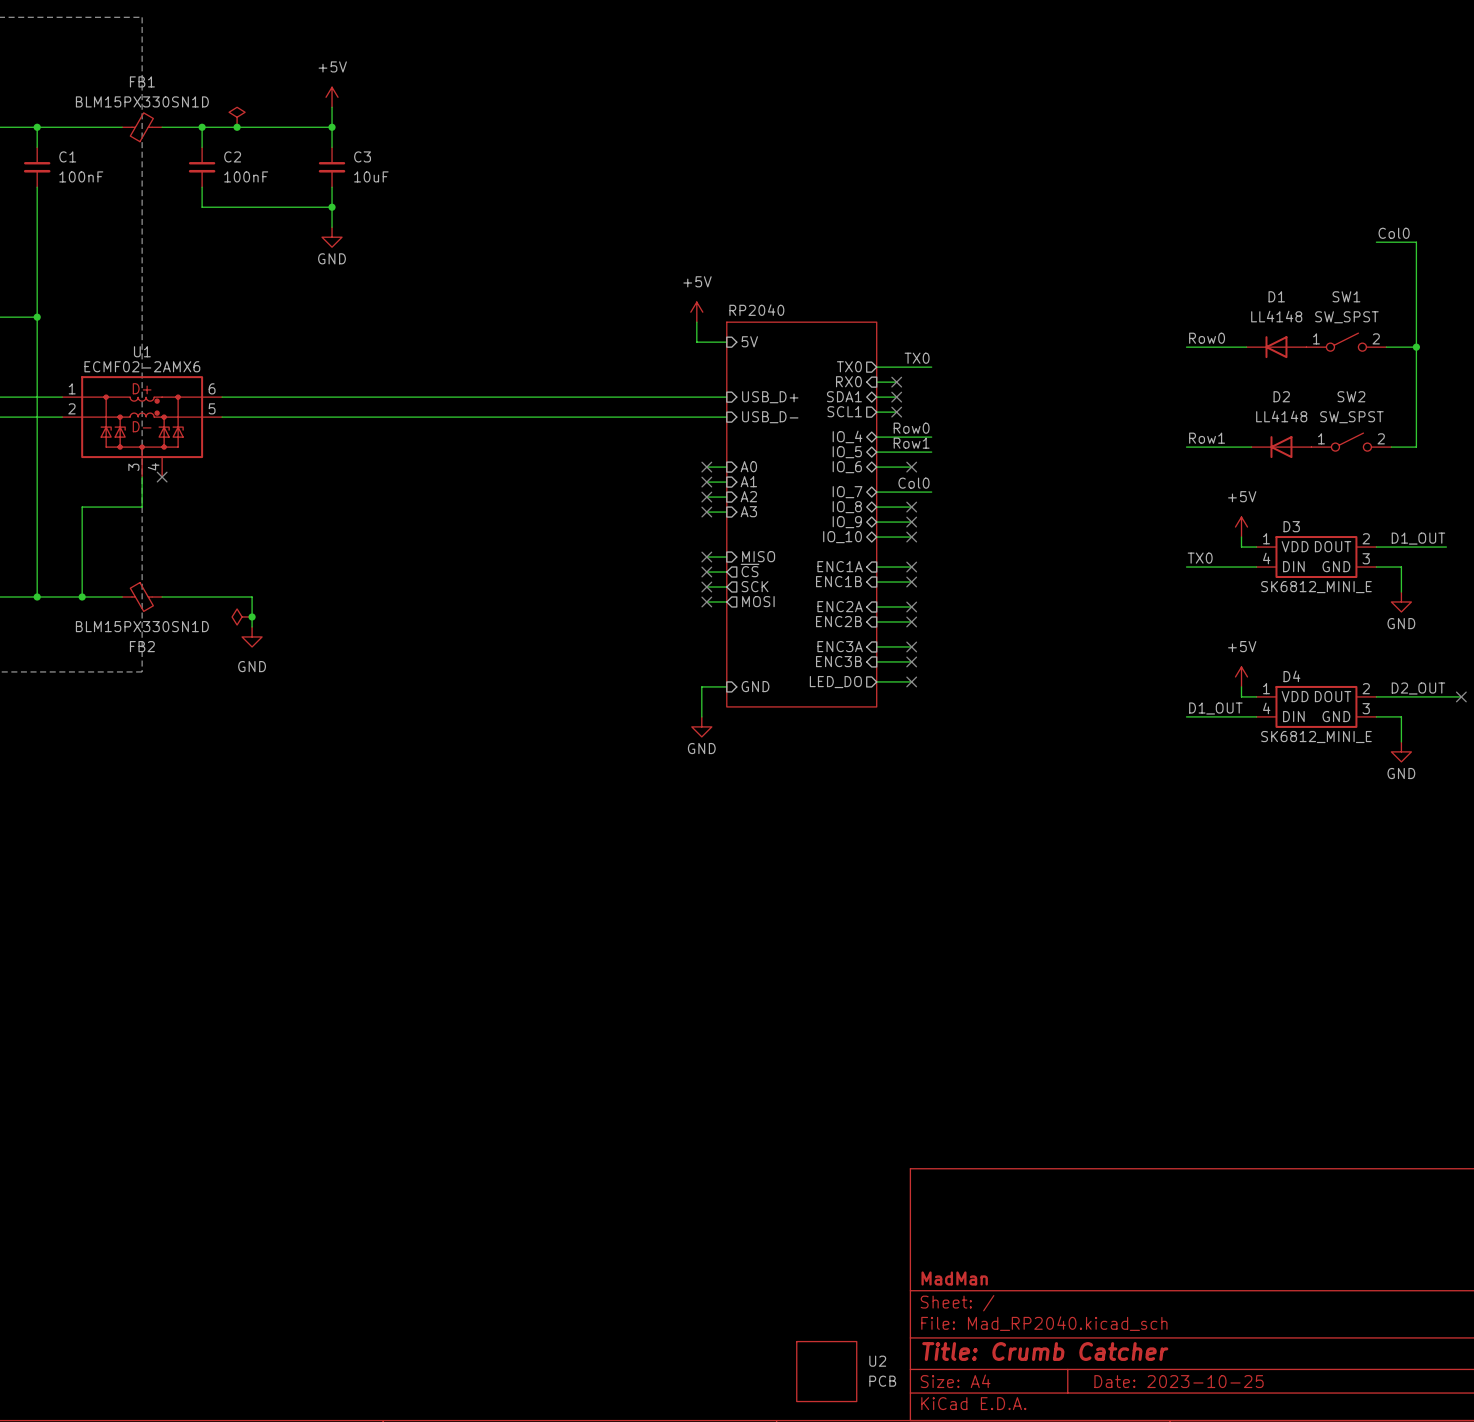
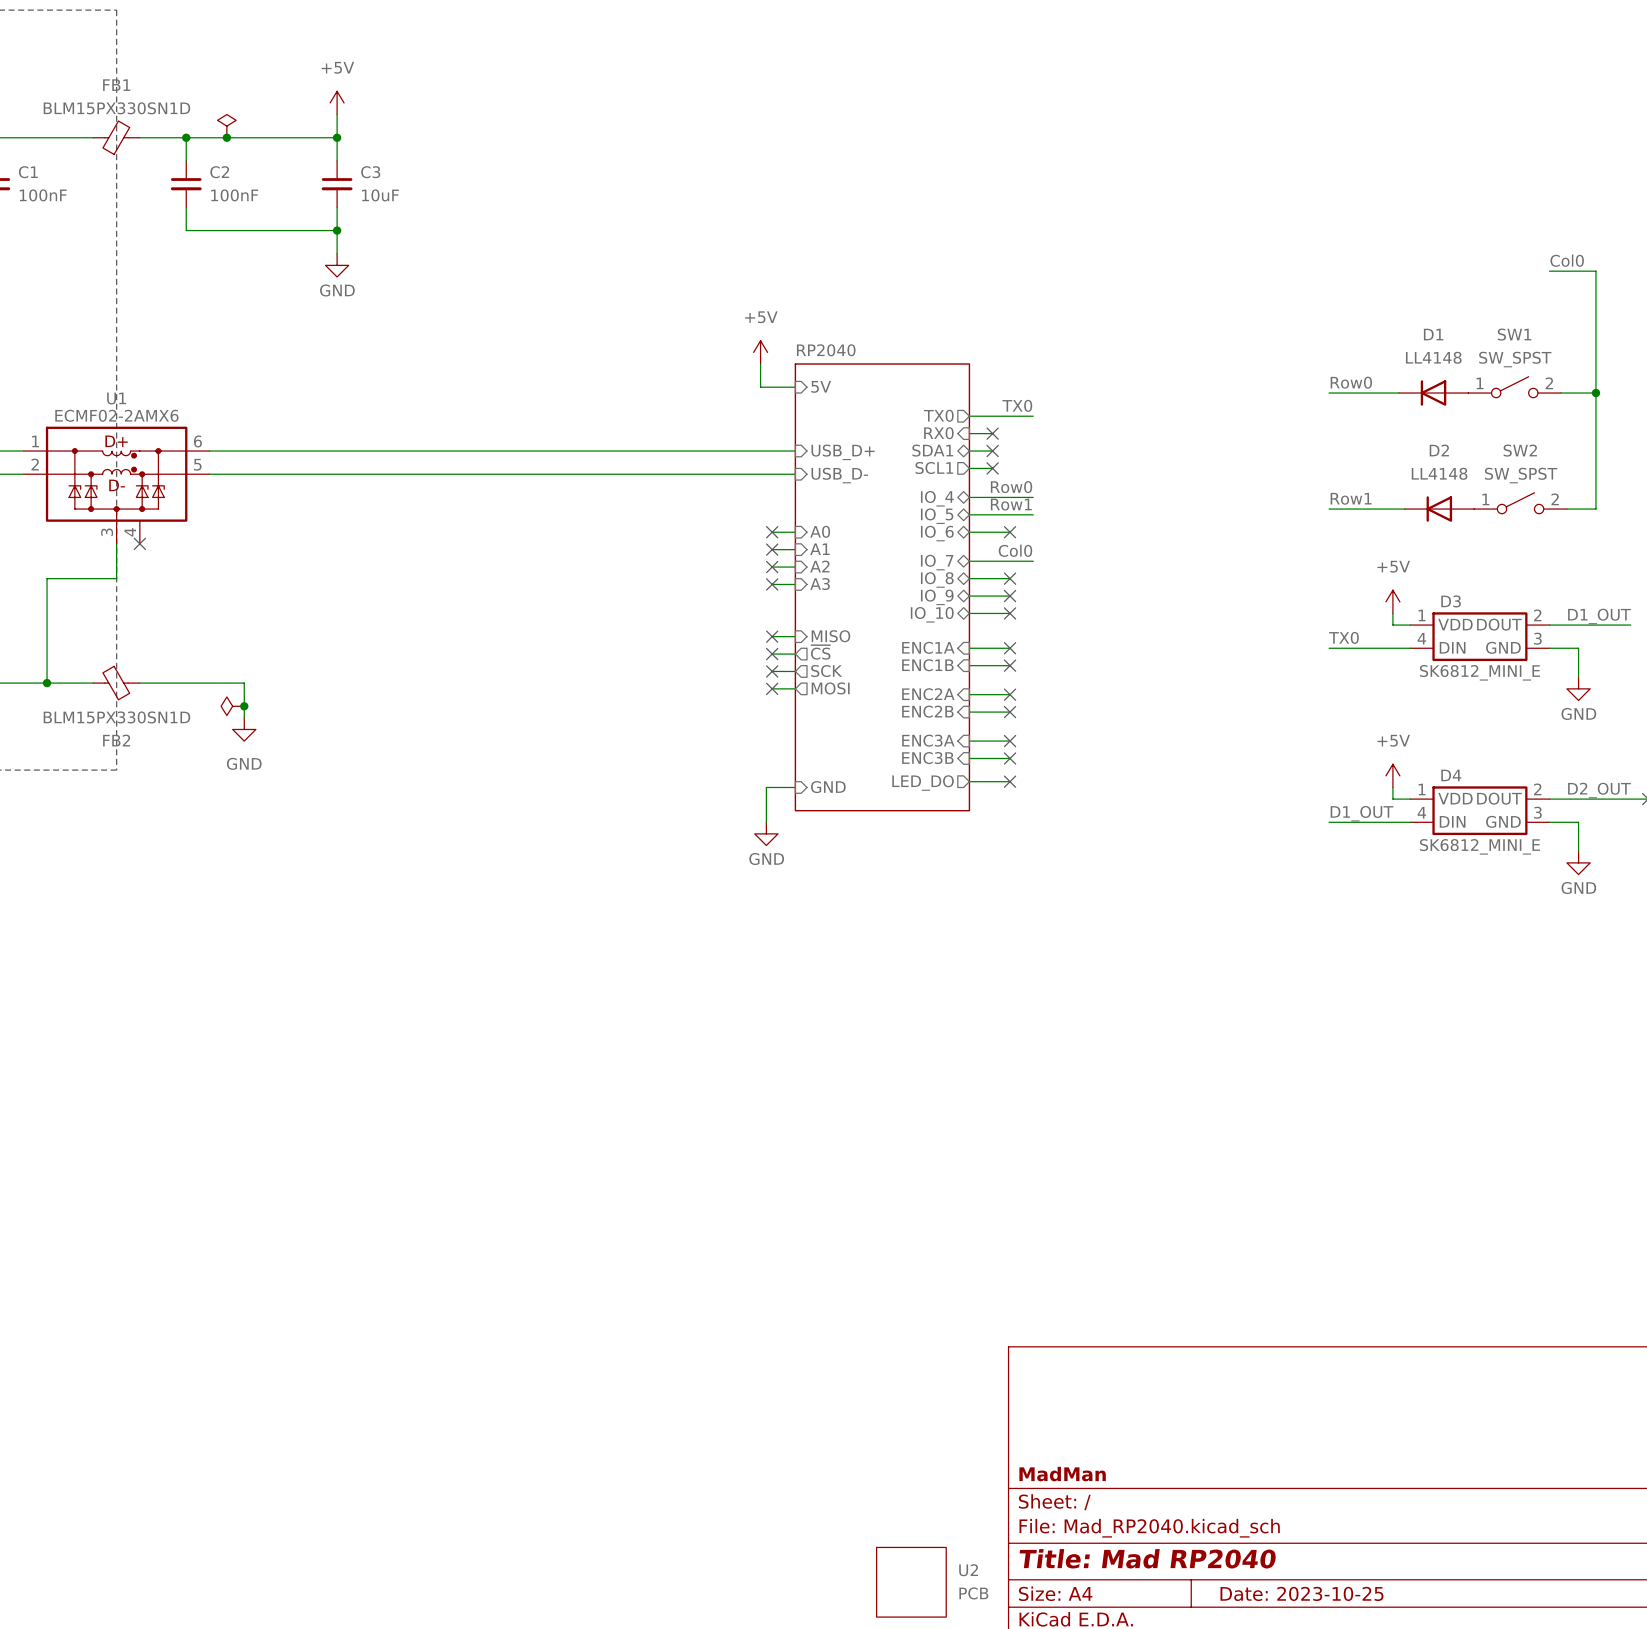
title block: Title: Crumb Catcher (1045, 1351) -> Title: Mad RP2040 (1147, 1558)

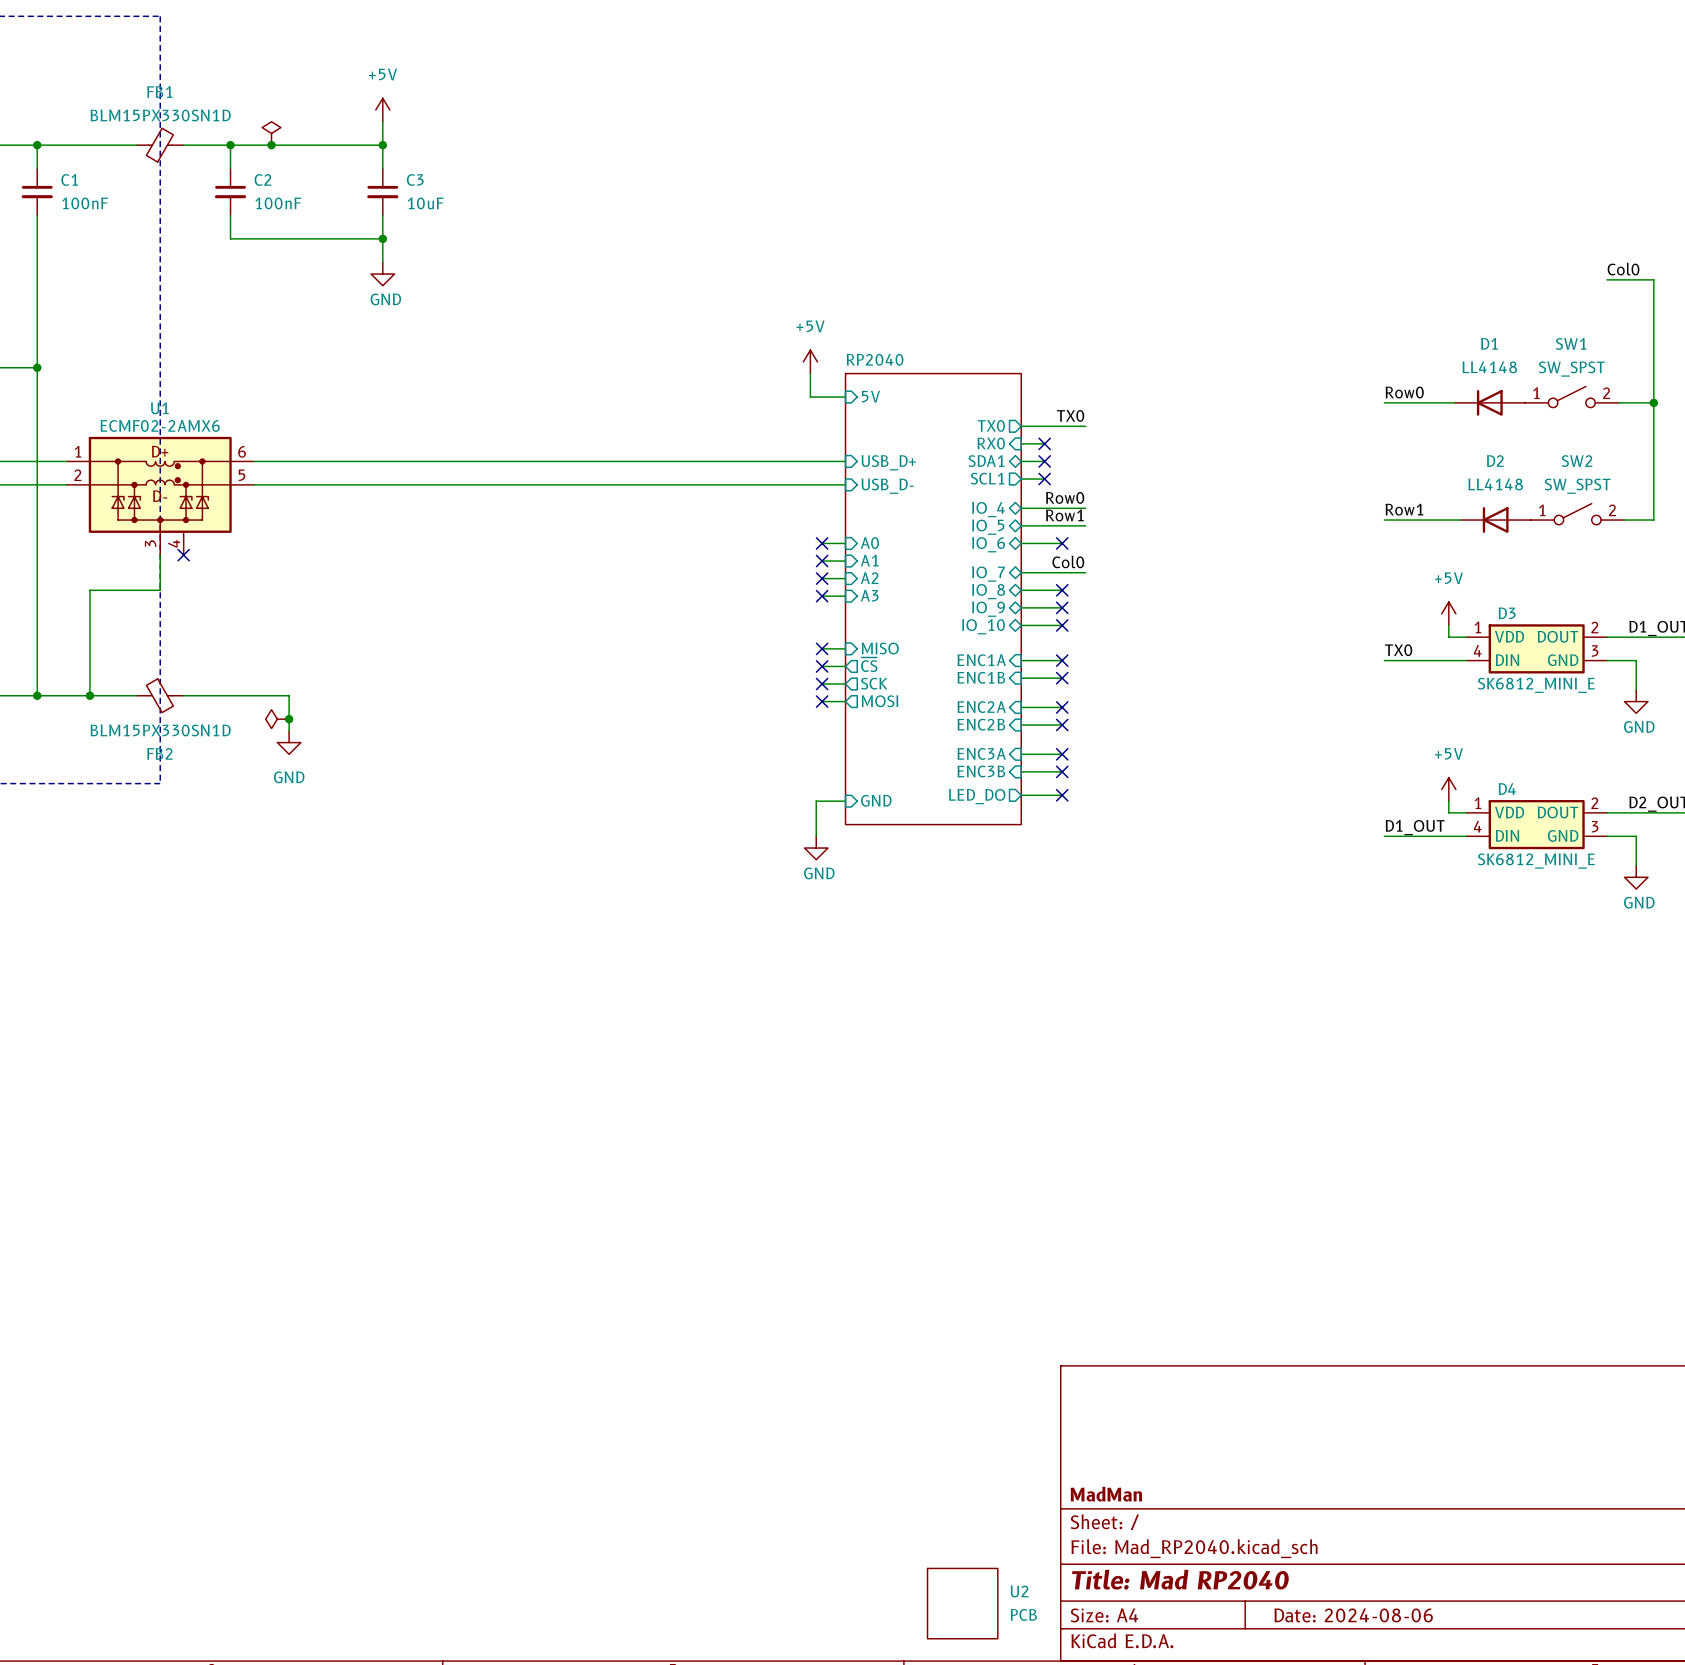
title block: Date: 2023-10-25 (1301, 1593) -> Date: 2024-08-06 (1353, 1615)

